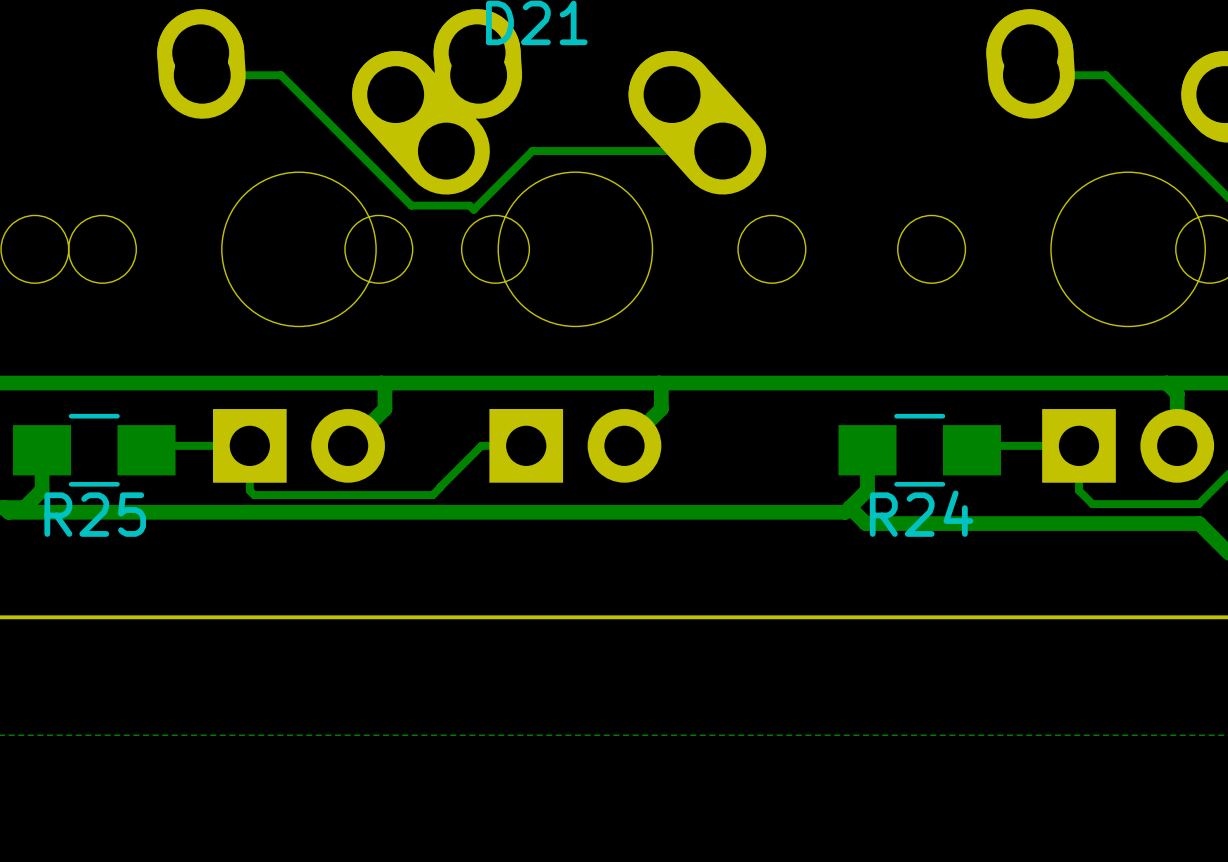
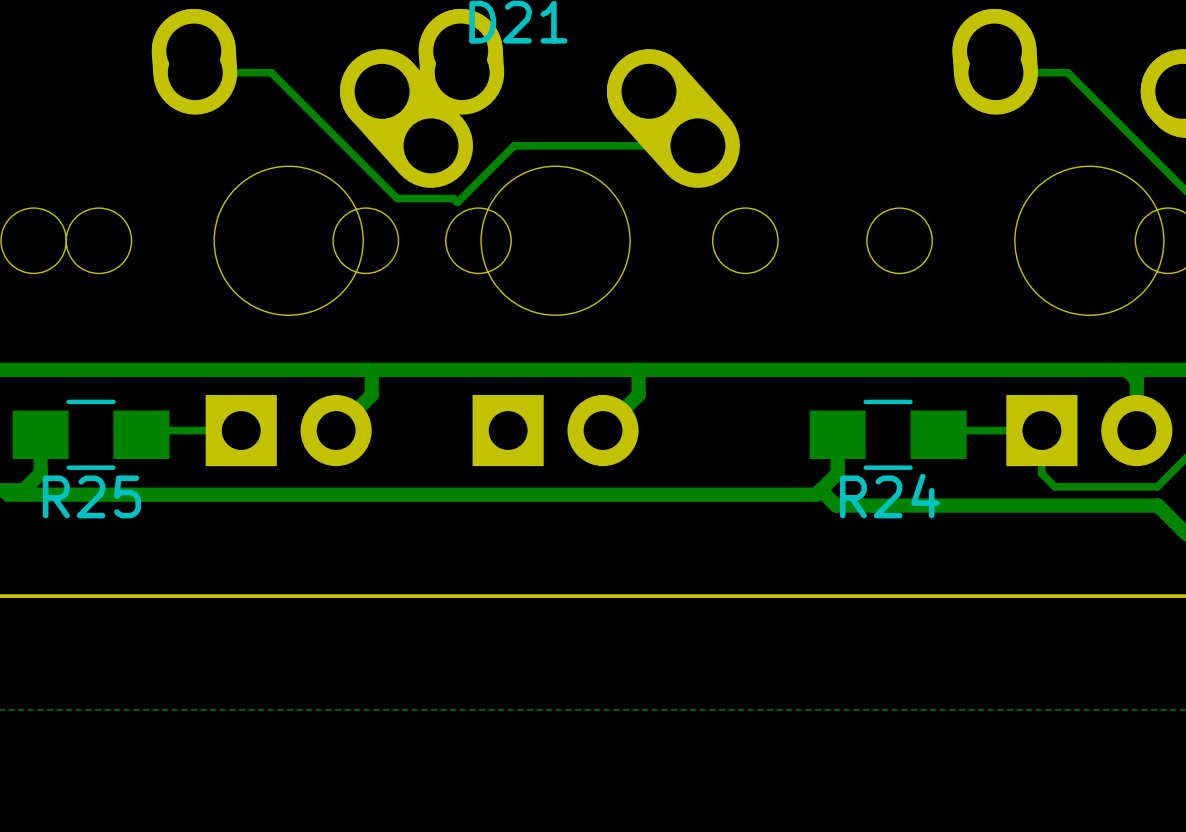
track: (249, 445) (249, 490) (254, 495) (432, 495) (440, 487) -> none
track: (526, 445) (481, 445) (440, 487) -> none

